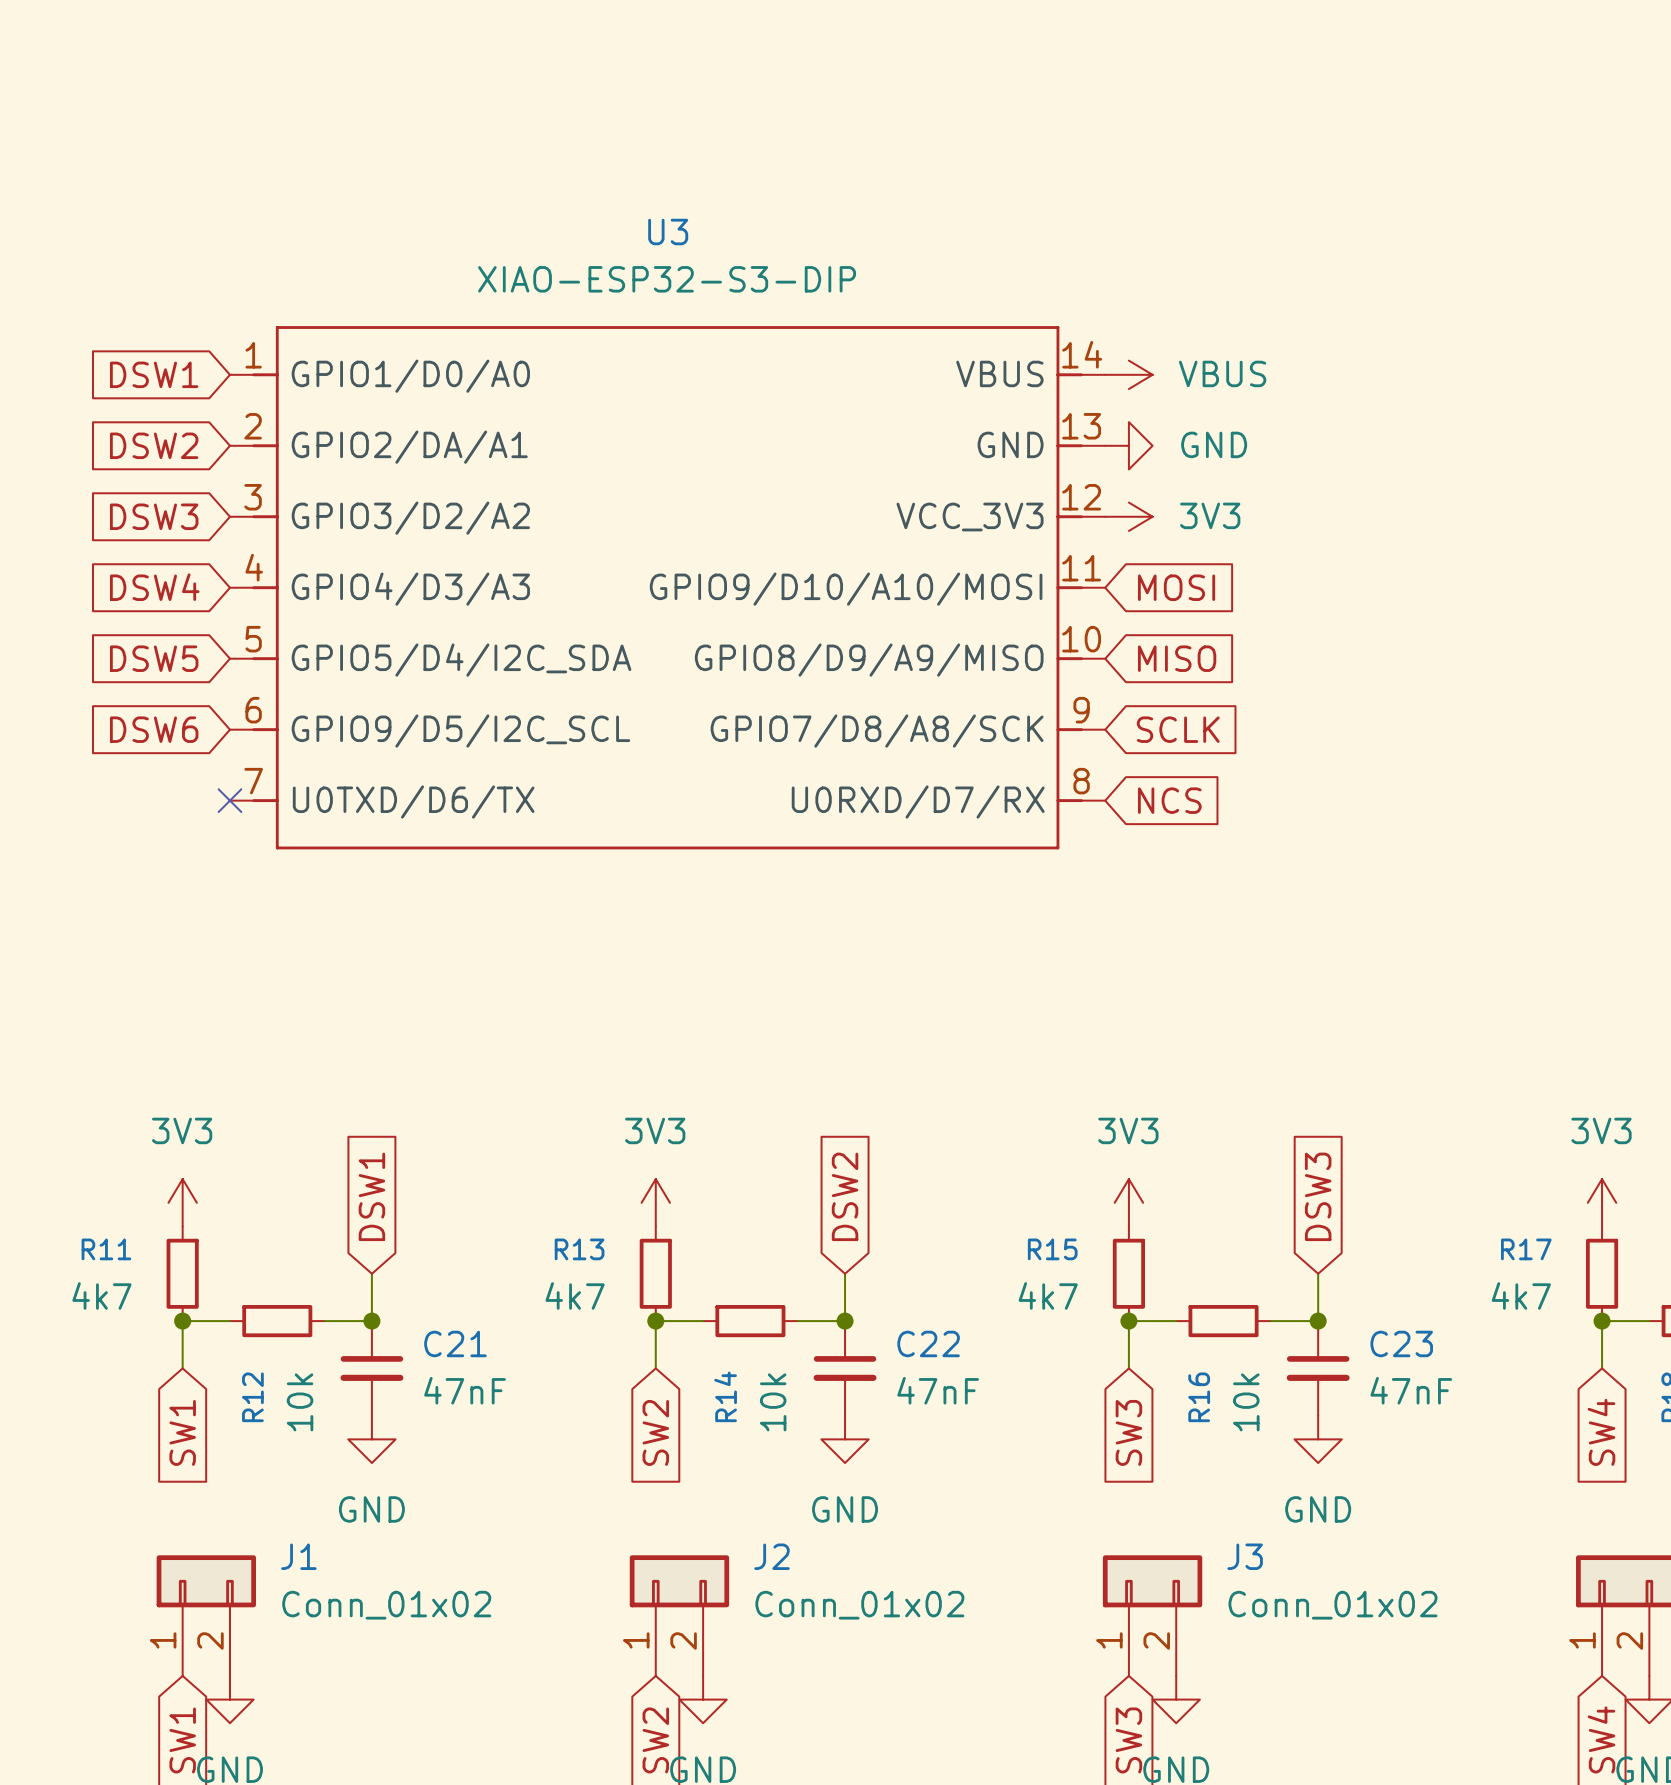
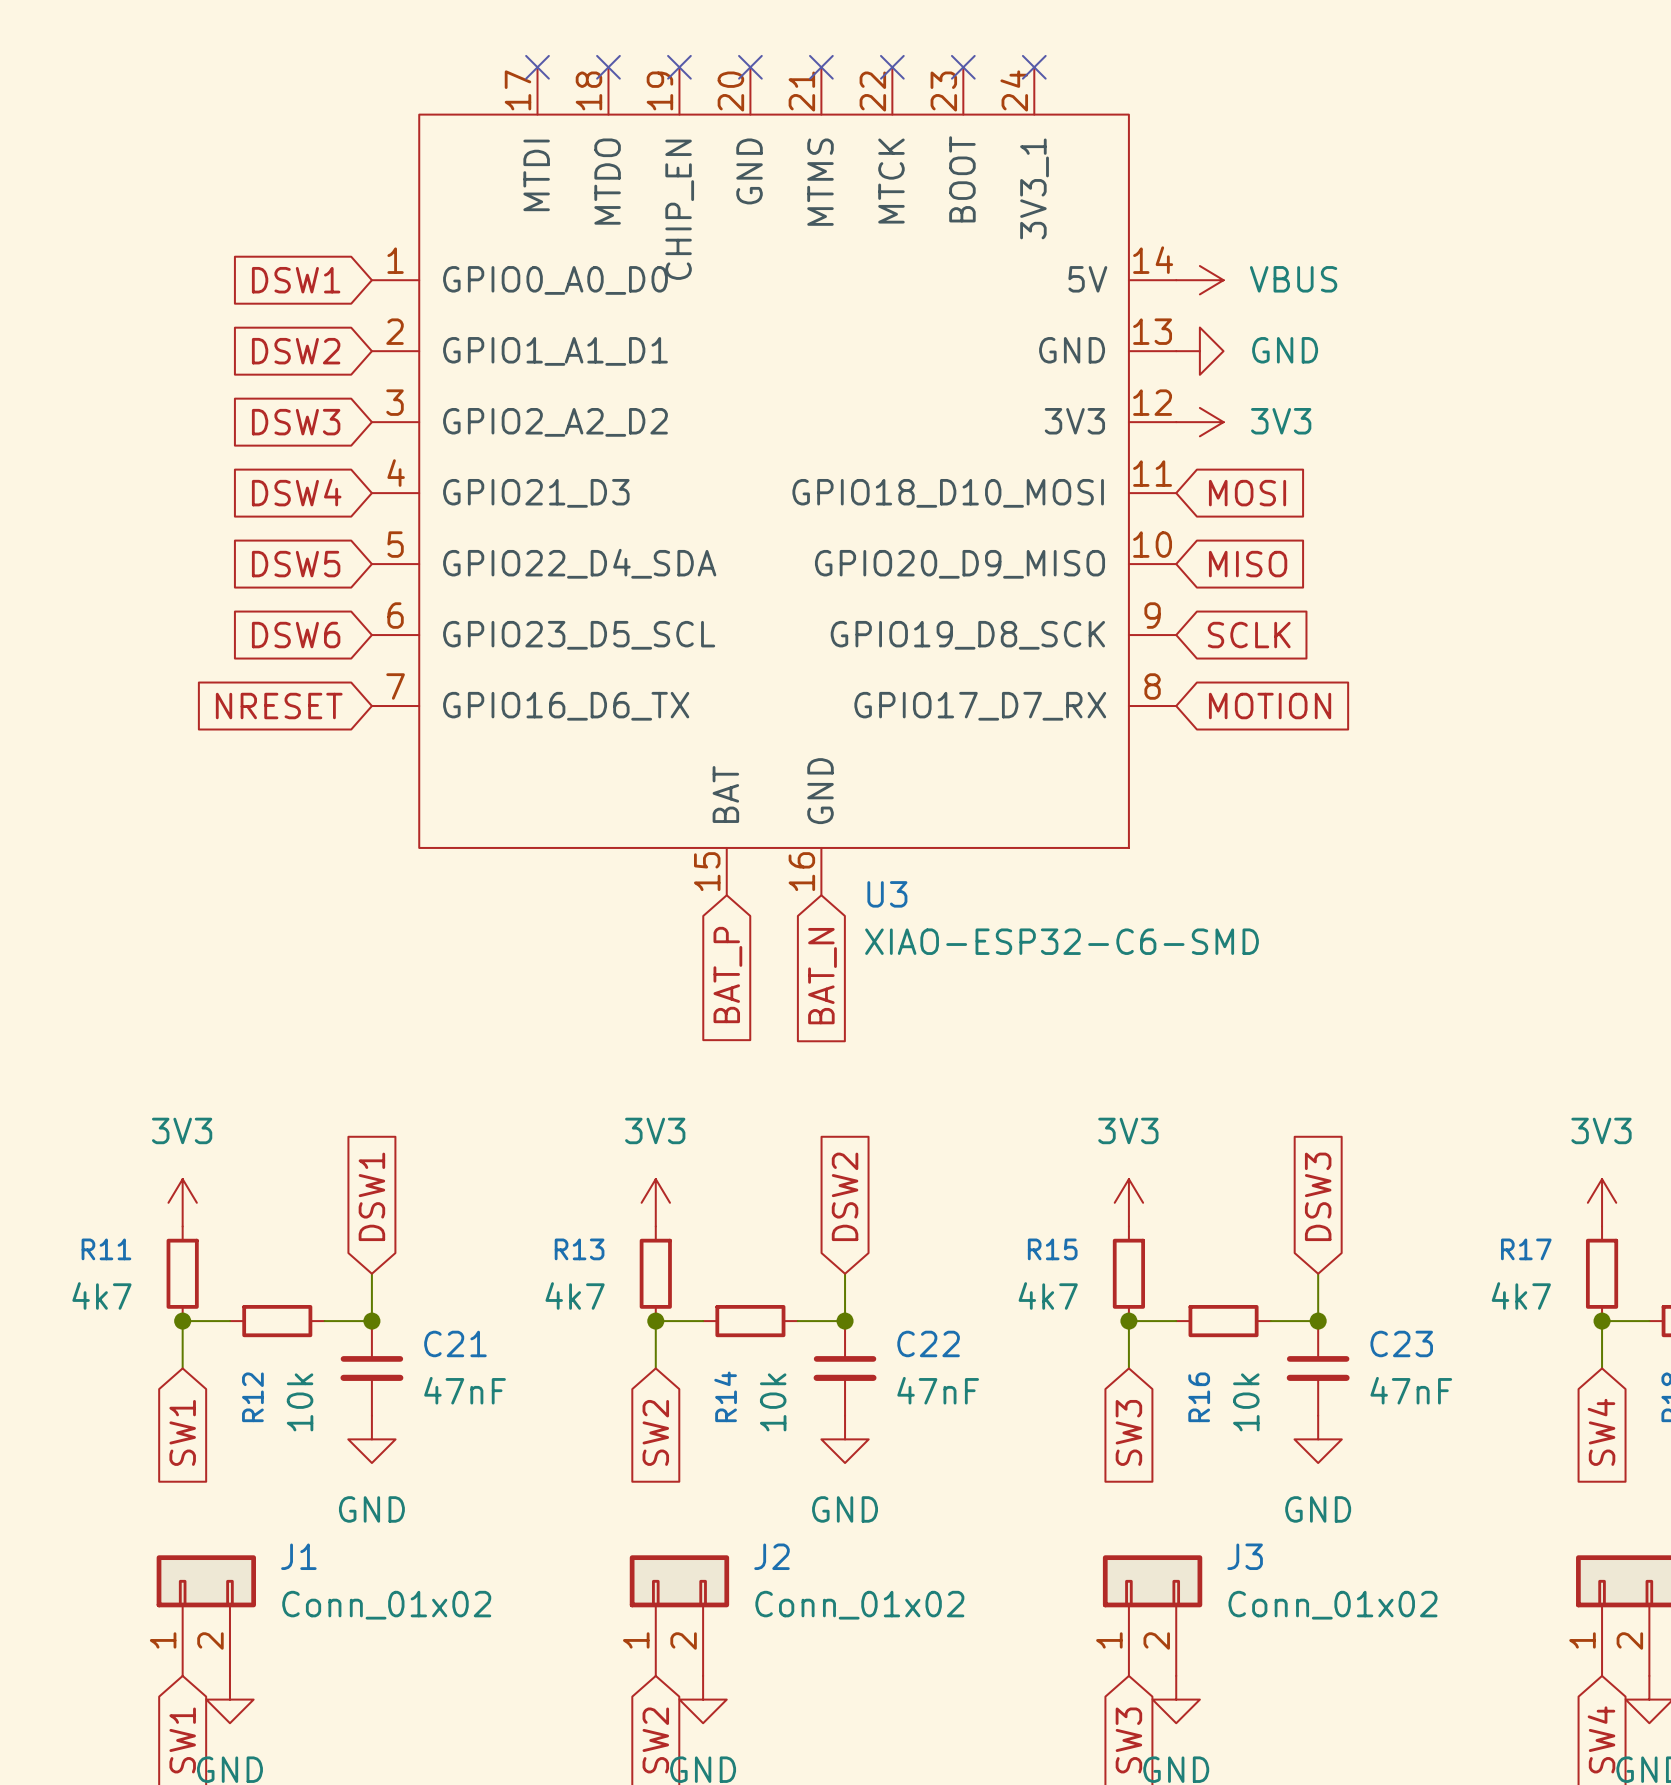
no-connect mark: none -> (537, 67)
no-connect mark: none -> (608, 67)
no-connect mark: none -> (679, 67)
no-connect mark: none -> (750, 67)
no-connect mark: none -> (821, 67)
no-connect mark: none -> (892, 67)
no-connect mark: none -> (963, 67)
no-connect mark: none -> (1034, 67)
U3 name position: U3 (668, 232) -> U3 (887, 894)
U3 value: XIAO-ESP32-S3-DIP (667, 279) -> XIAO-ESP32-C6-SMD (1062, 941)
U3 symbol: [229, 326, 1106, 850] -> [371, 67, 1177, 896]
global label position: DSW1 (154, 374) -> DSW1 (296, 280)
power symbol position: VBUS (1128, 374) -> VBUS (1199, 280)
global label position: DSW2 (154, 445) -> DSW2 (296, 351)
power symbol position: GND (1128, 445) -> GND (1199, 351)
global label position: DSW3 (154, 516) -> DSW3 (296, 422)
power symbol position: 3V3 (1128, 516) -> 3V3 (1199, 422)
global label position: DSW4 (154, 587) -> DSW4 (296, 492)
global label position: MOSI (1176, 587) -> MOSI (1247, 493)
global label position: DSW5 (154, 658) -> DSW5 (296, 564)
global label position: MISO (1177, 658) -> MISO (1248, 564)
global label: none -> NRESET (279, 706)
global label: none -> MOTION (1270, 706)
global label position: DSW6 (154, 729) -> DSW6 (296, 635)
global label position: SCLK (1178, 729) -> SCLK (1249, 635)
no-connect mark: (229, 800) -> none
global label: NCS (1169, 800) -> none
global label: none -> BAT_P (727, 975)
global label: none -> BAT_N (822, 976)

